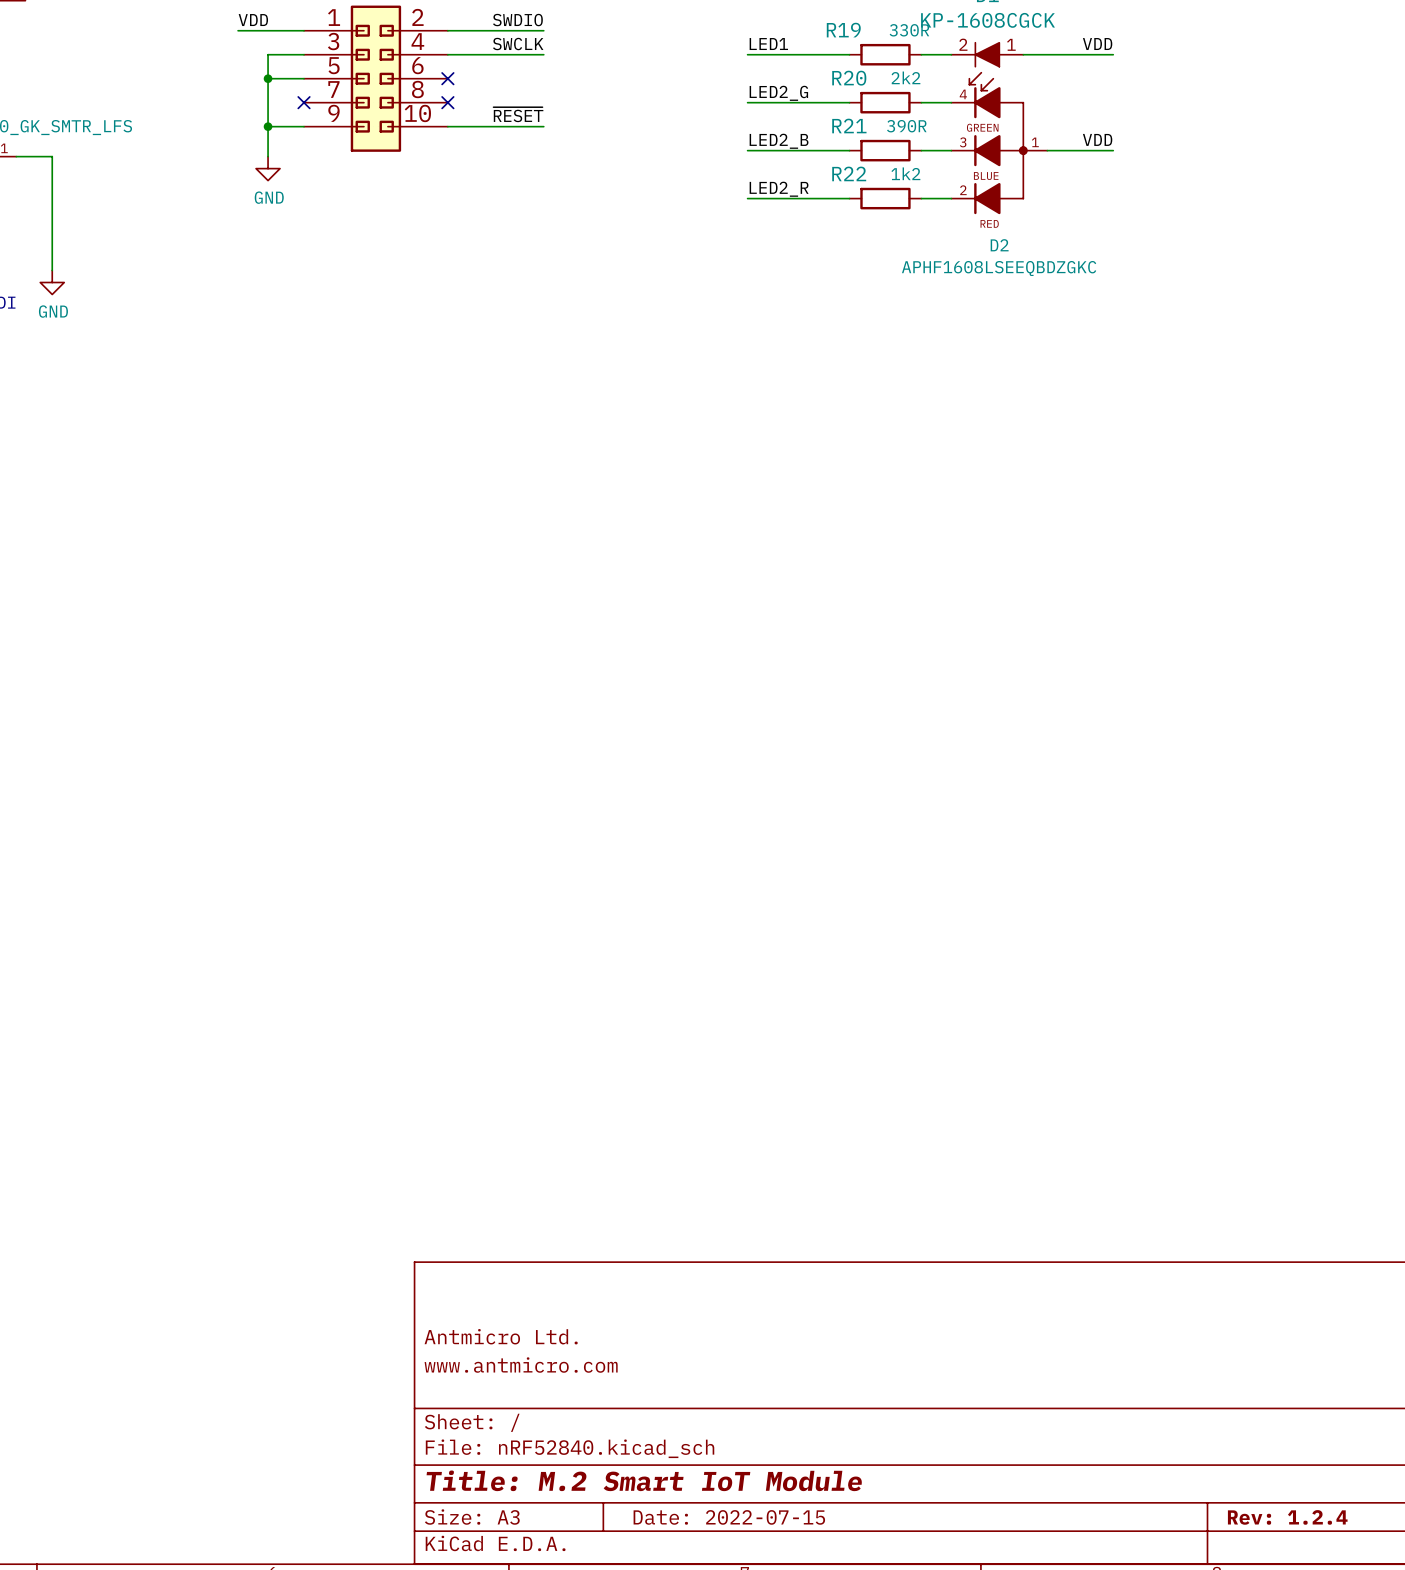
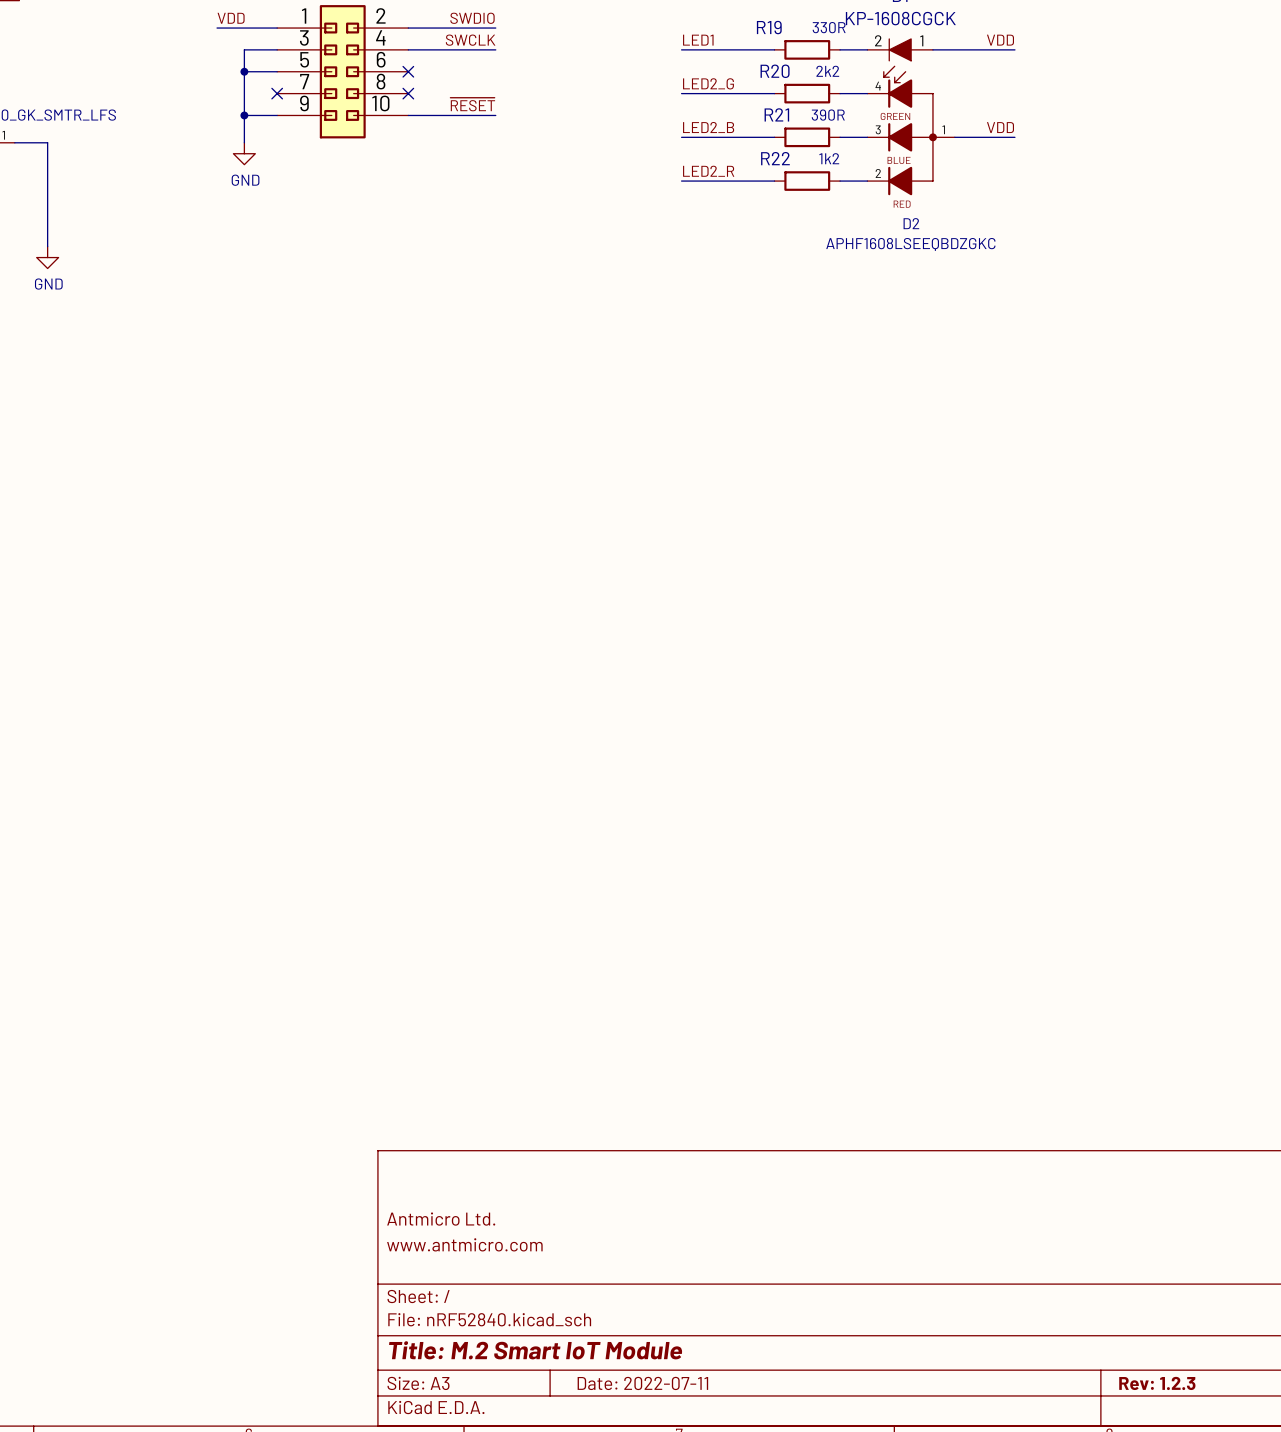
title block: Date: 2022-07-15 (729, 1517) -> Date: 2022-07-11 (642, 1383)
title block: Rev: 1.2.4 (1287, 1517) -> Rev: 1.2.3 (1157, 1383)

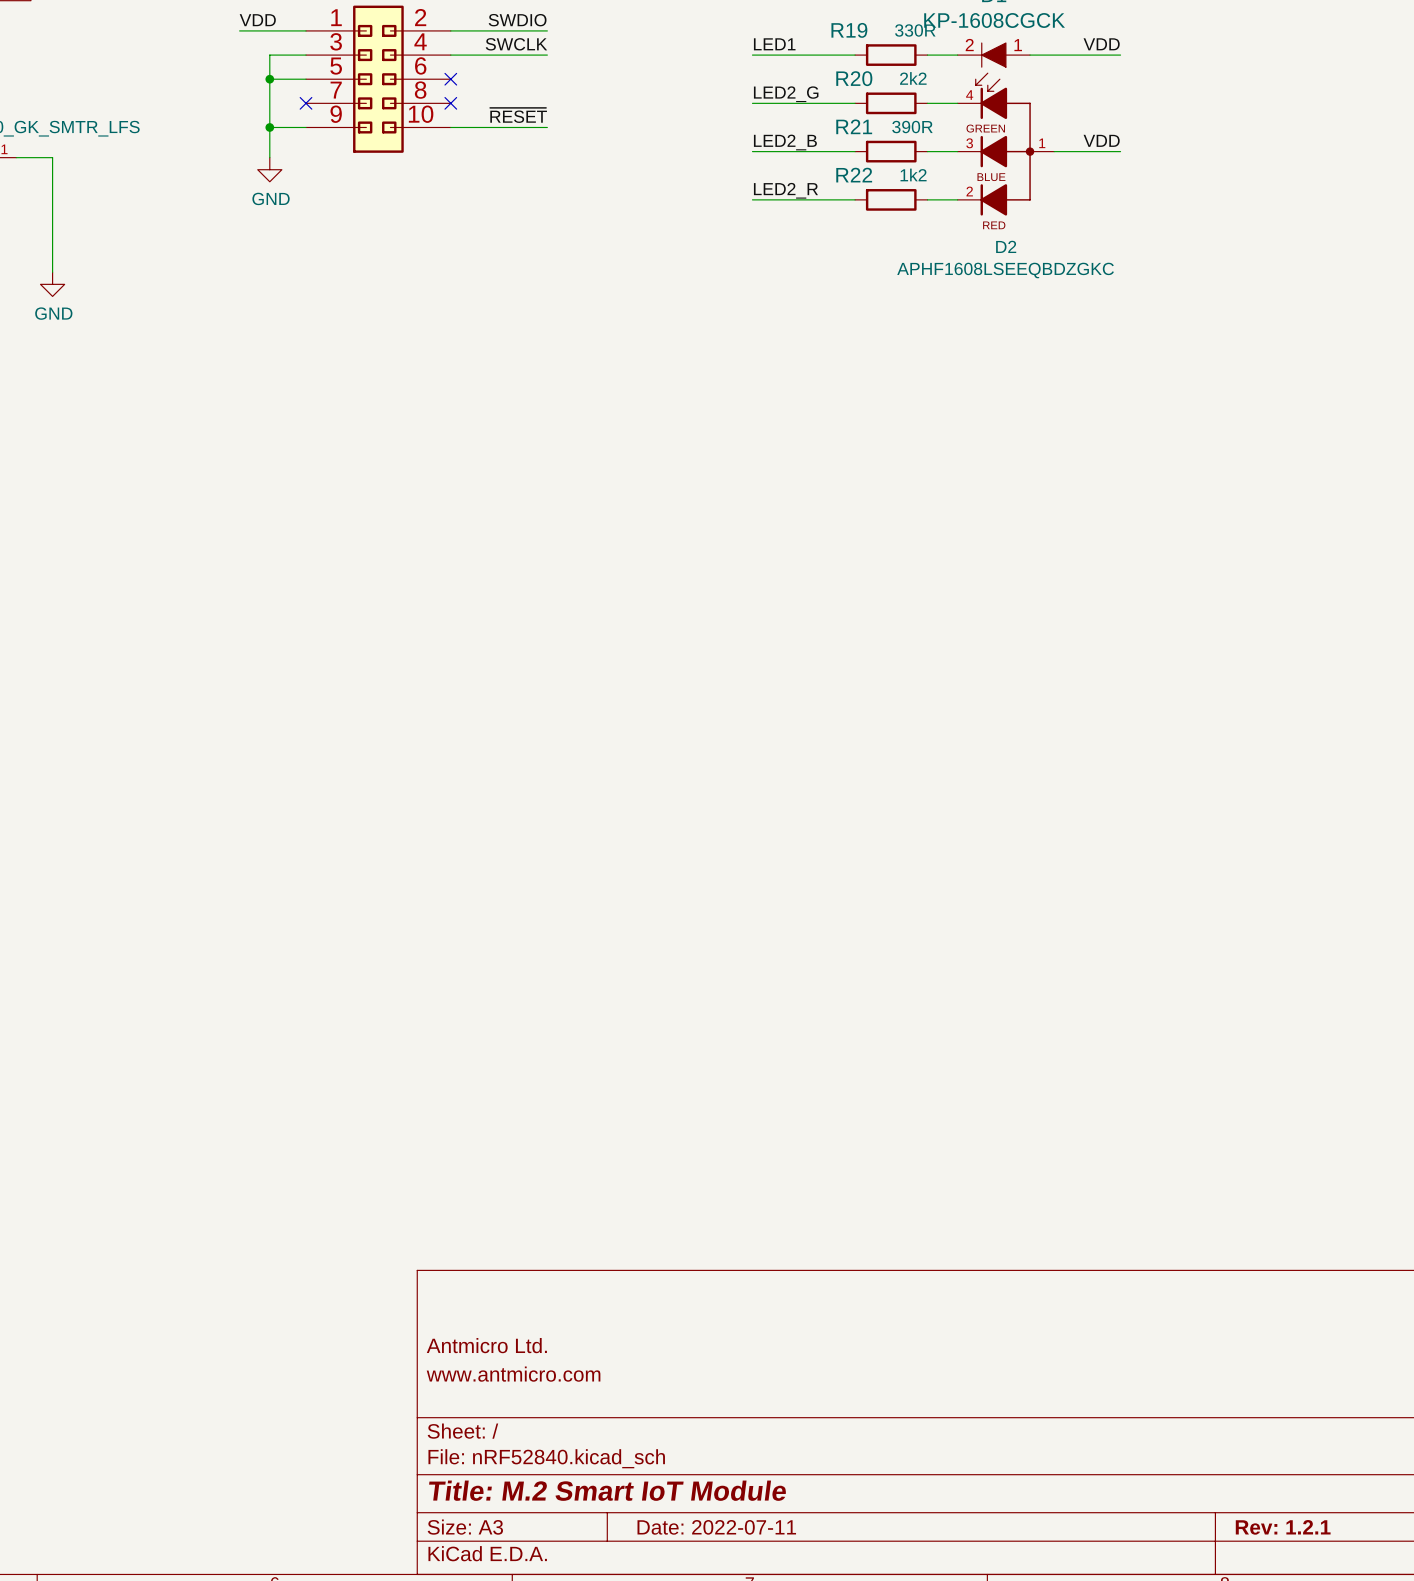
title block: Rev: 1.2.3 (1157, 1383) -> Rev: 1.2.1 (1283, 1527)

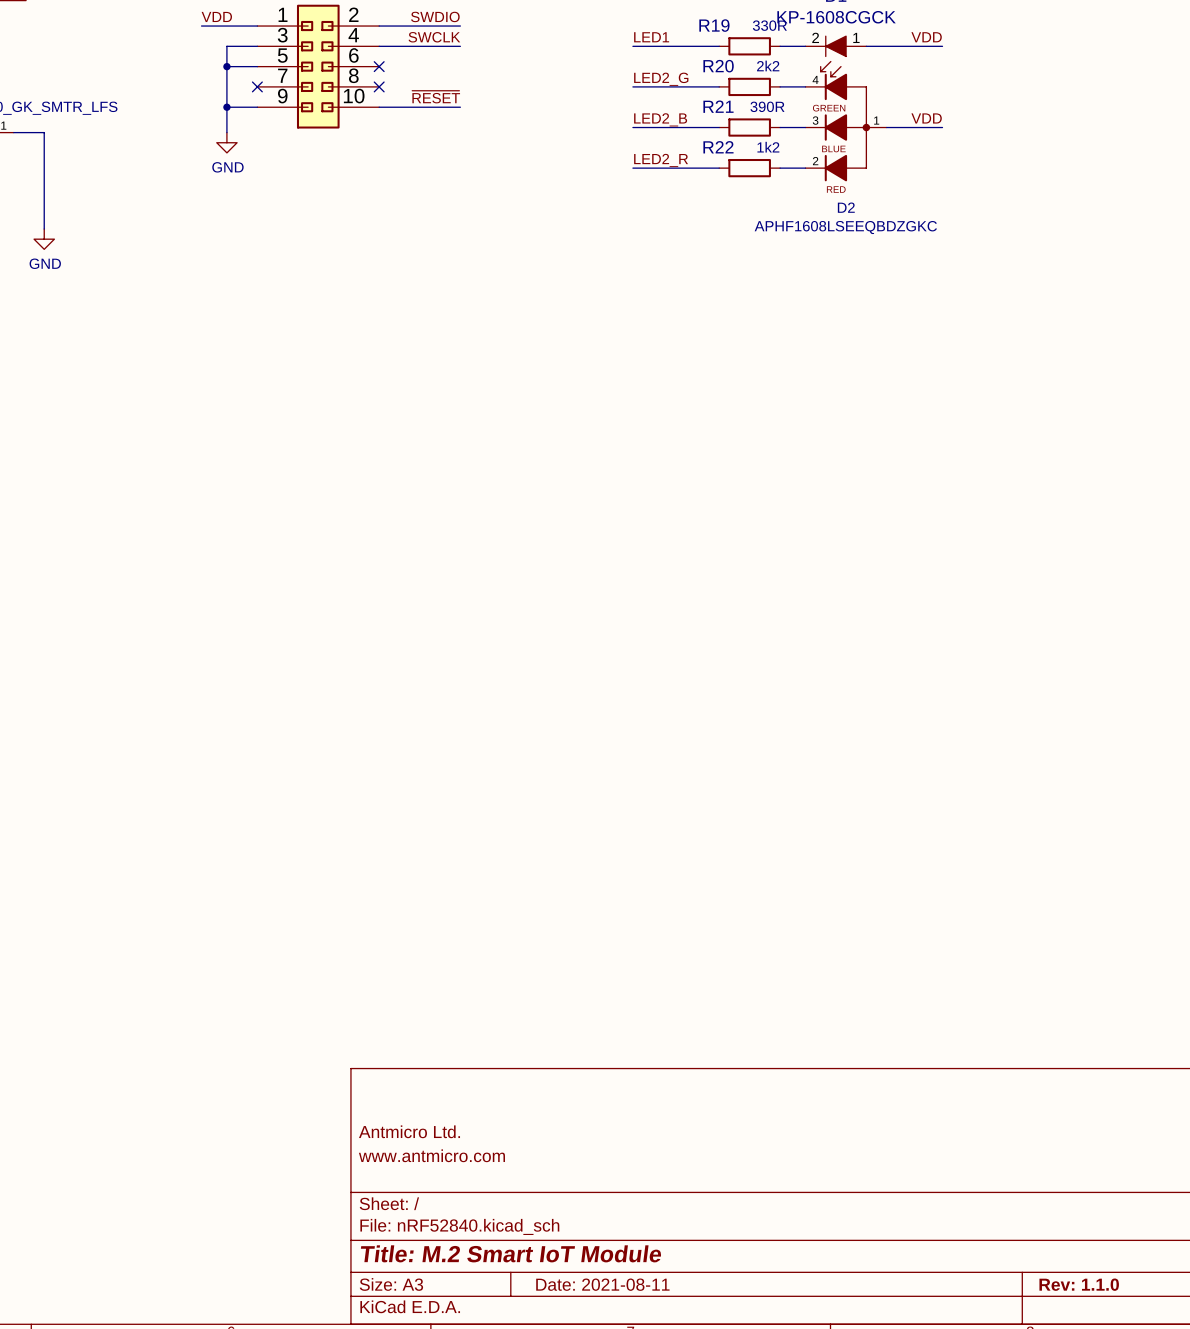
title block: Date: 2022-07-11 (716, 1527) -> Date: 2021-08-11 (602, 1284)
title block: Rev: 1.2.1 (1283, 1527) -> Rev: 1.1.0 (1079, 1284)

